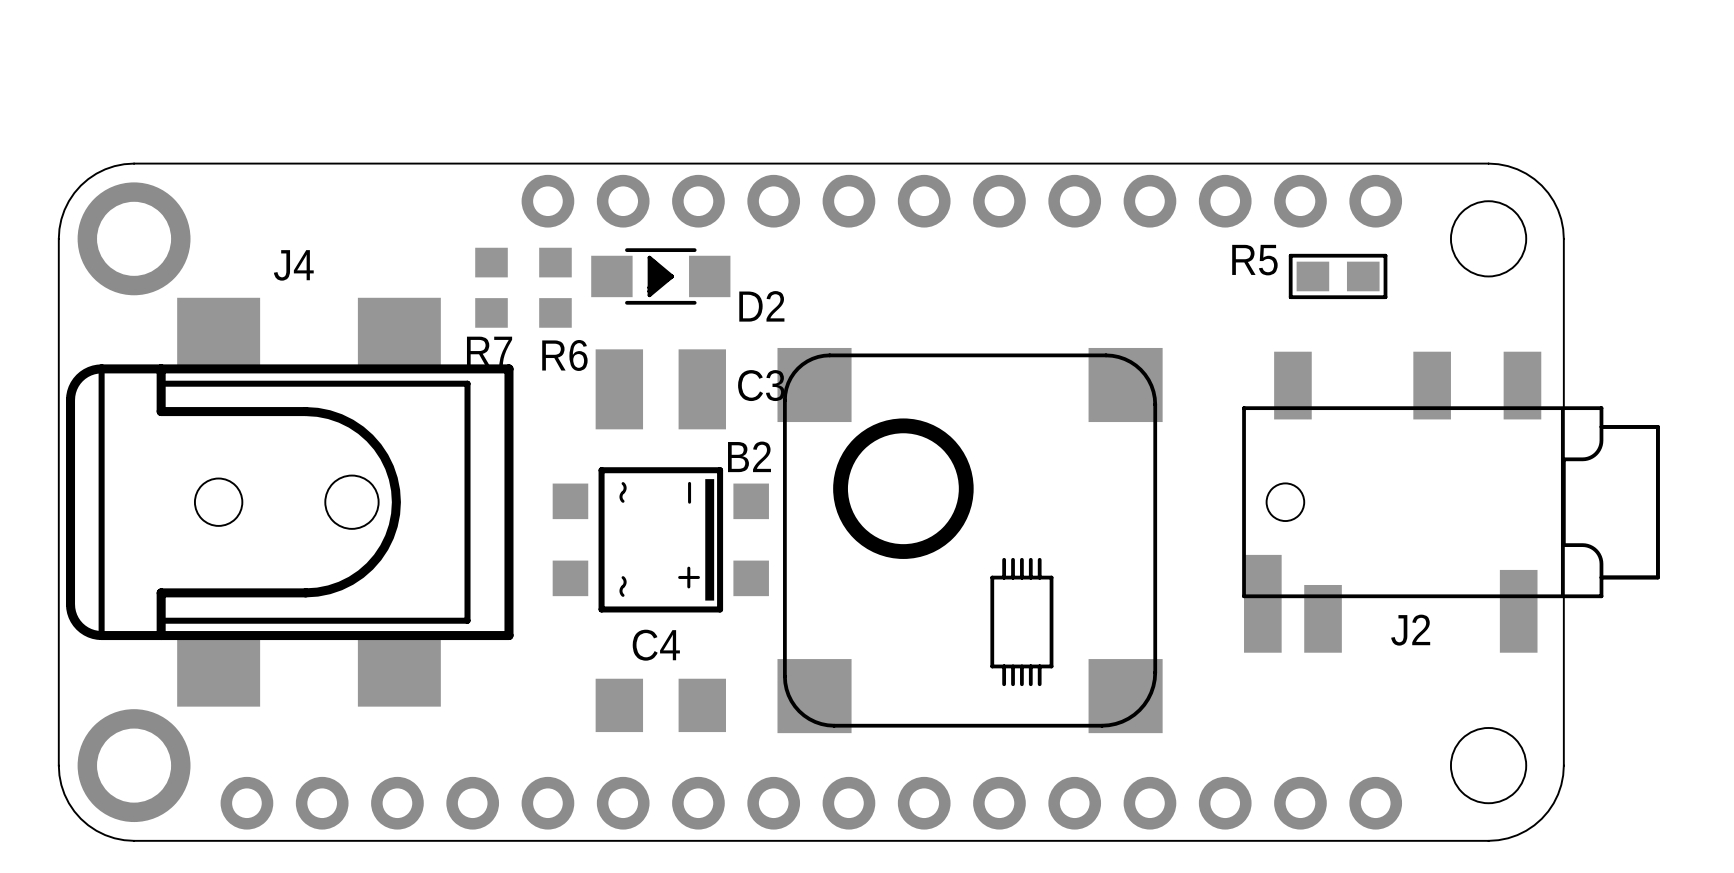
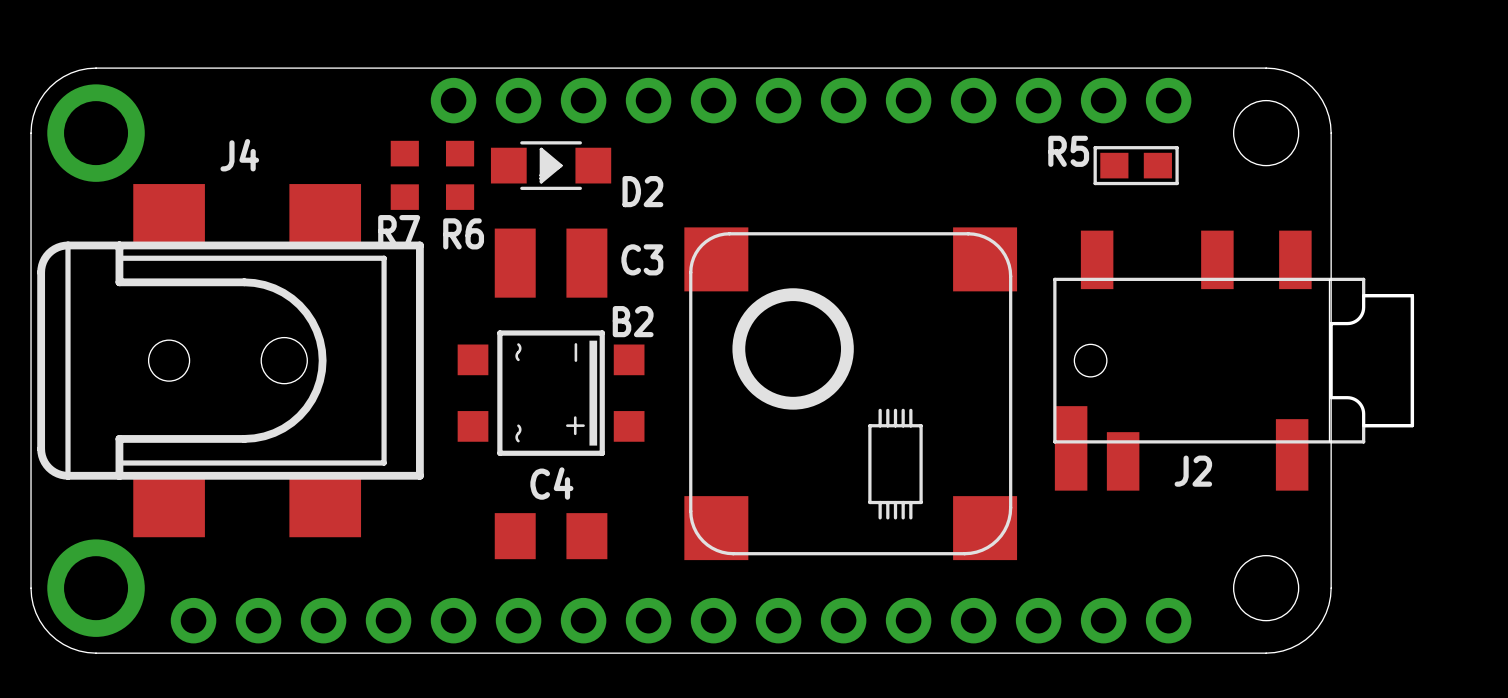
part position: (970, 540) -> (850, 393)

